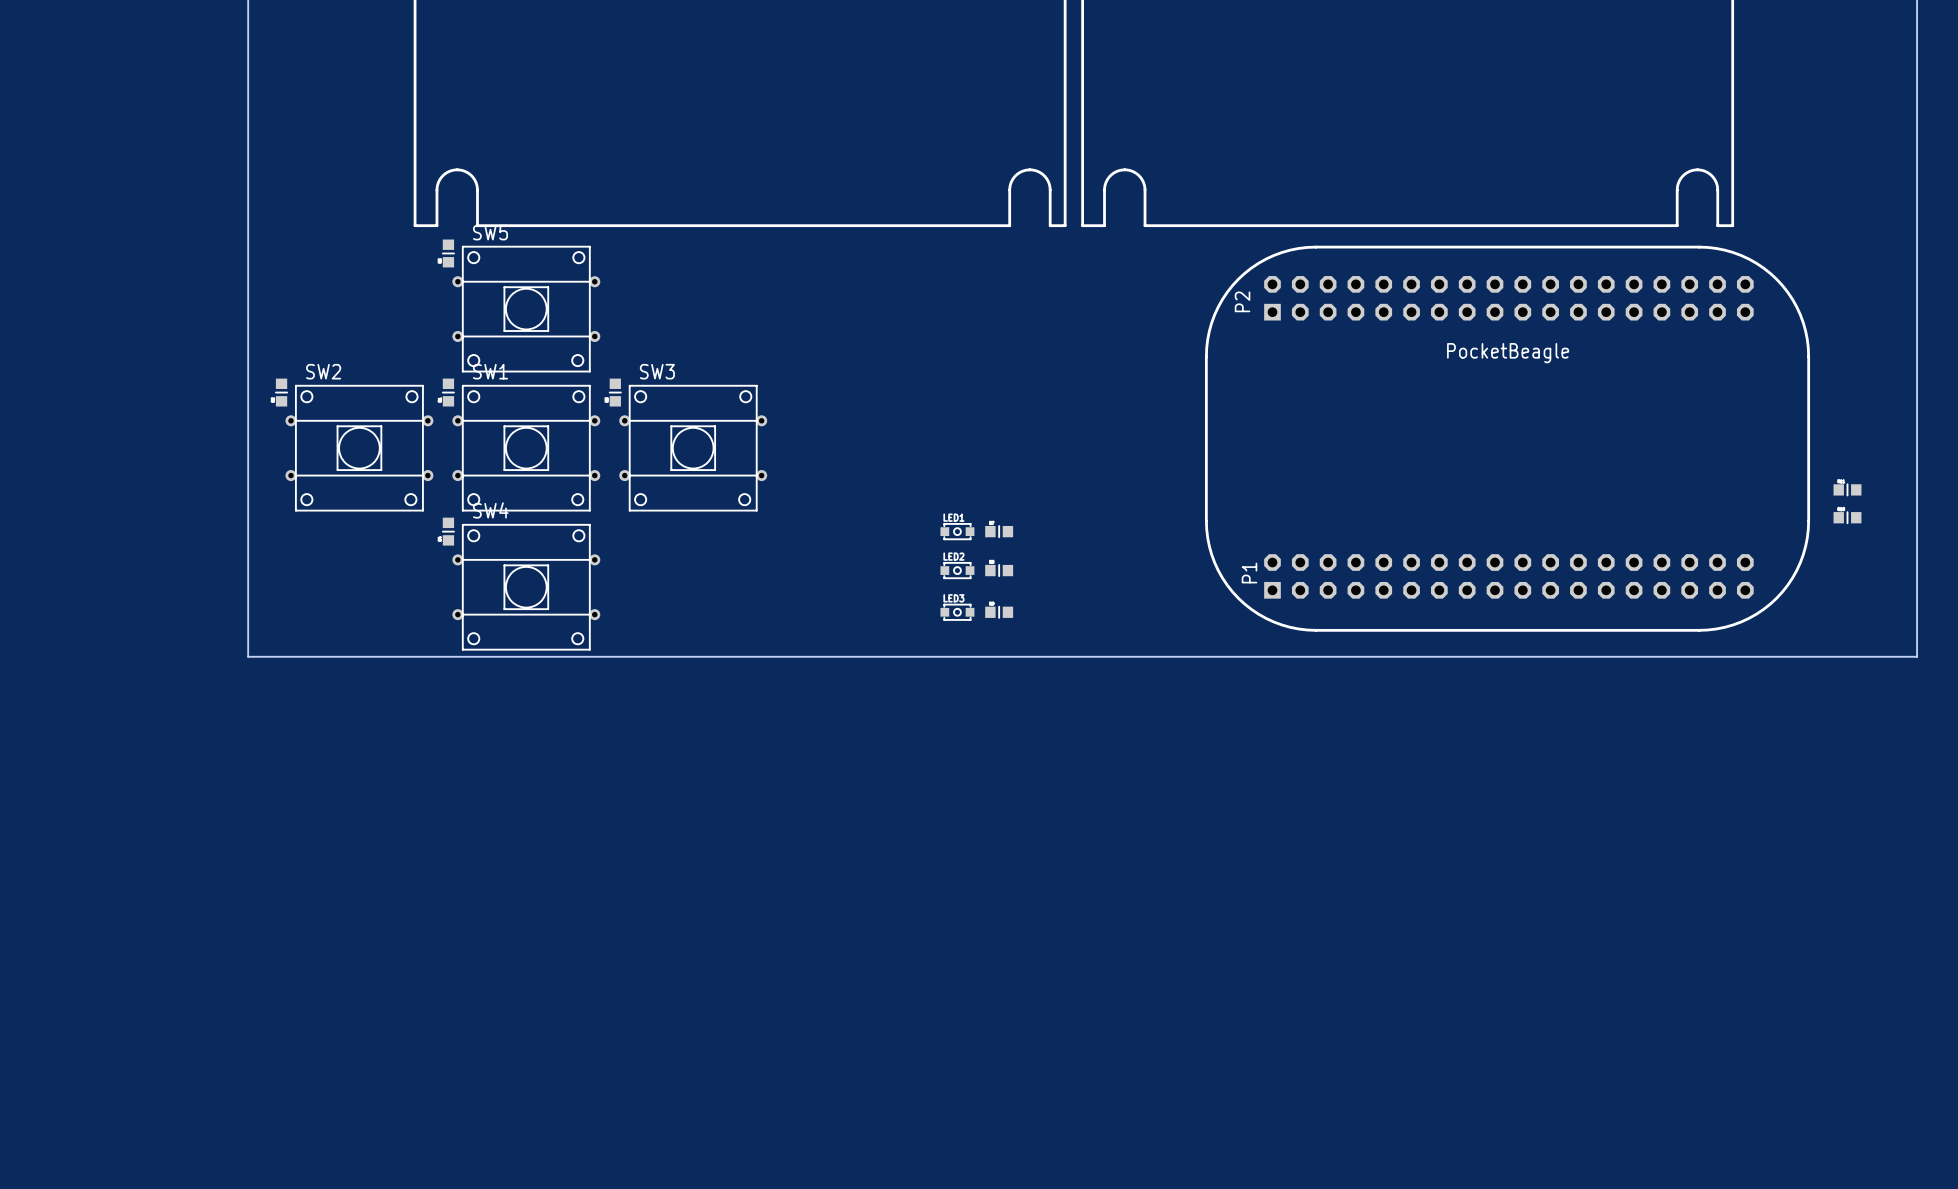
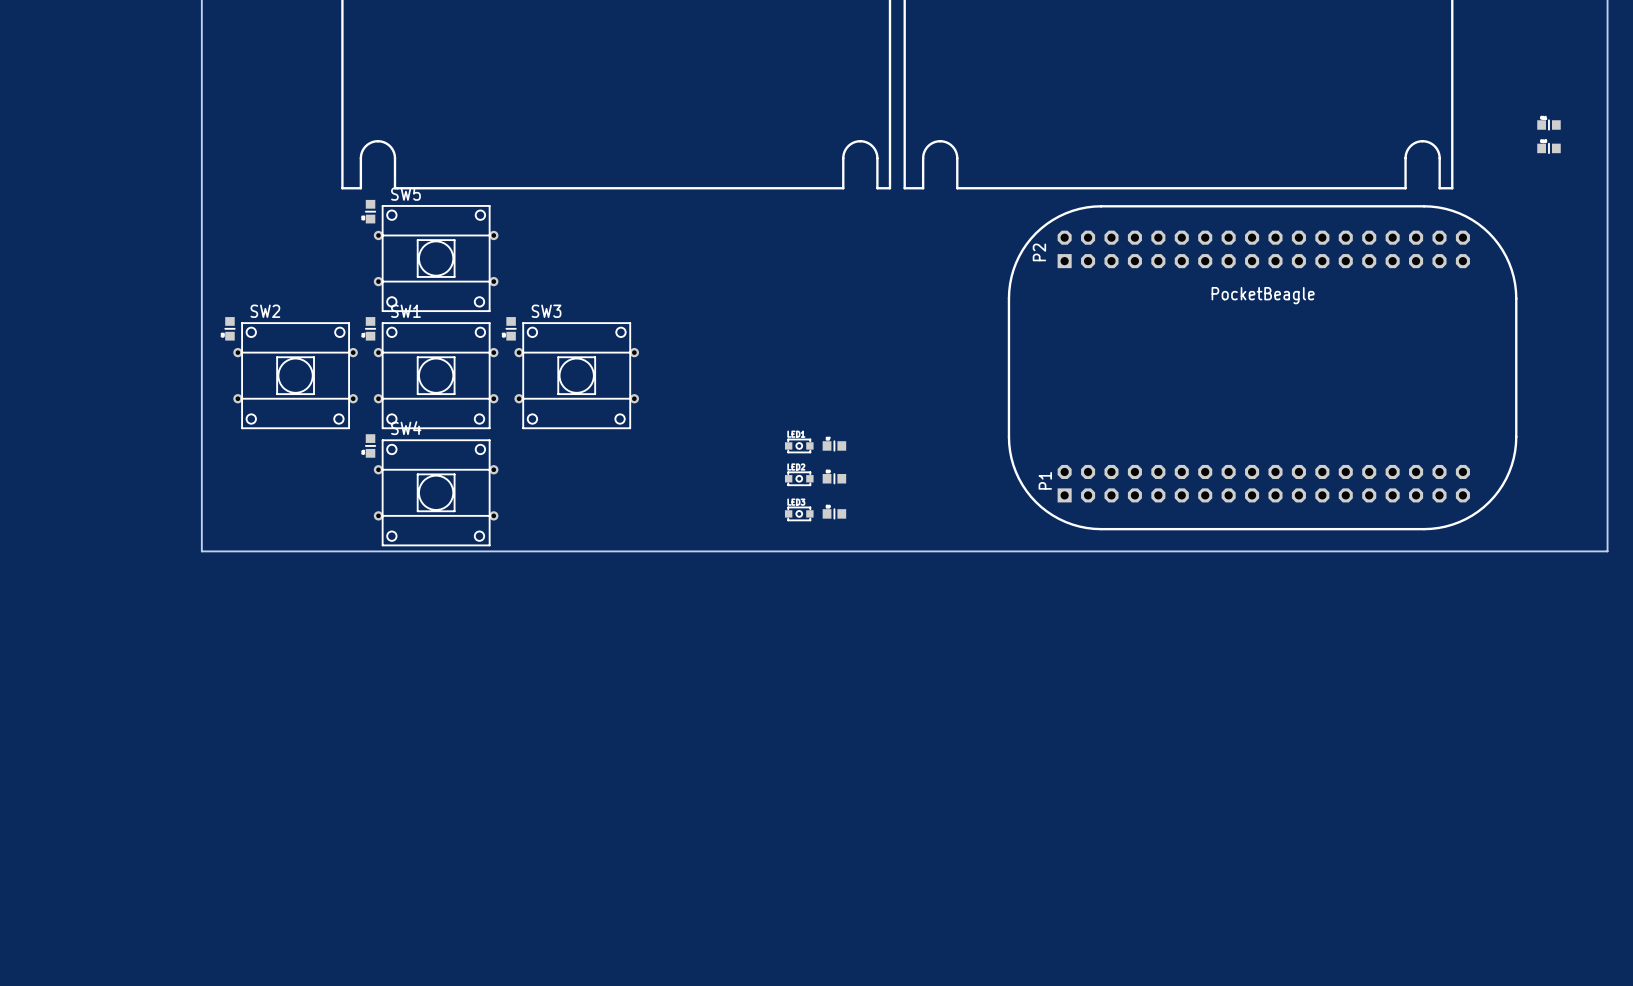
part position: (1847, 489) -> (1548, 124)
part position: (1847, 517) -> (1548, 148)

